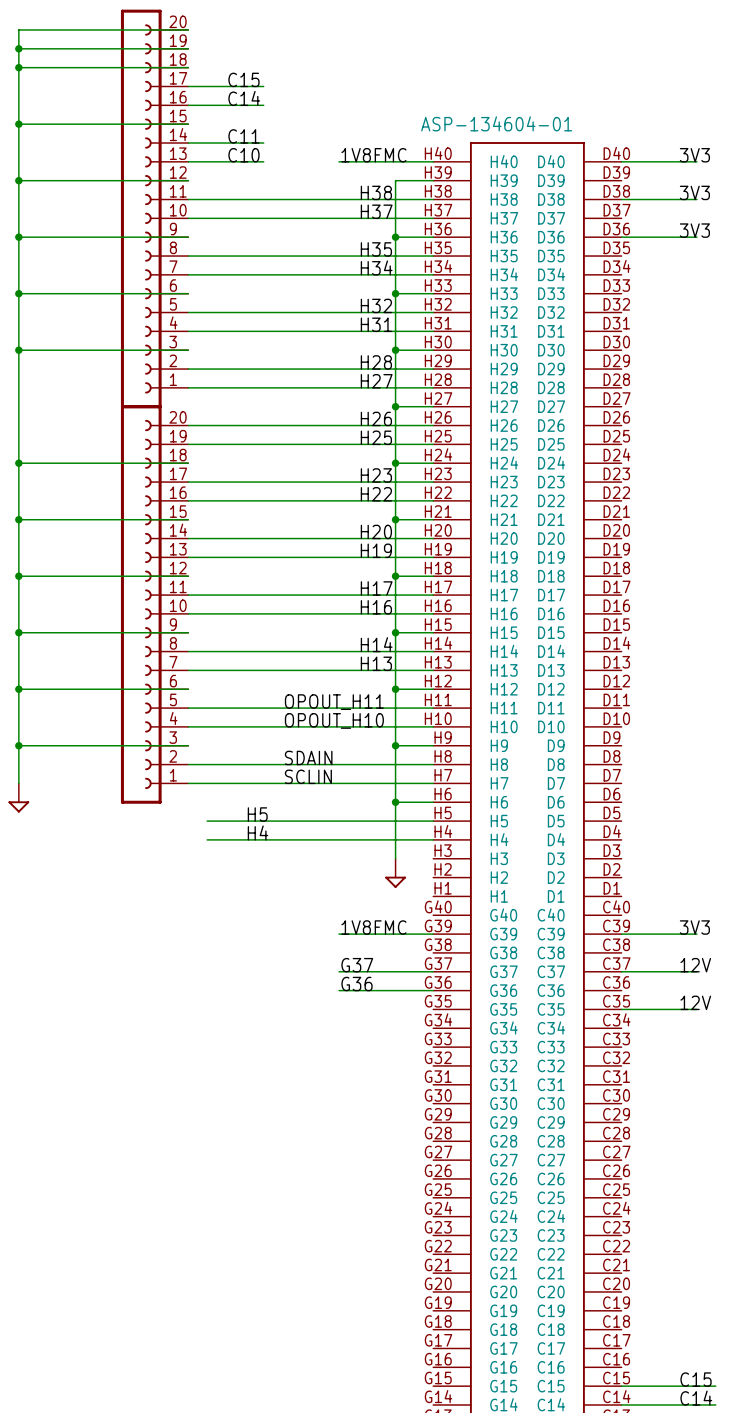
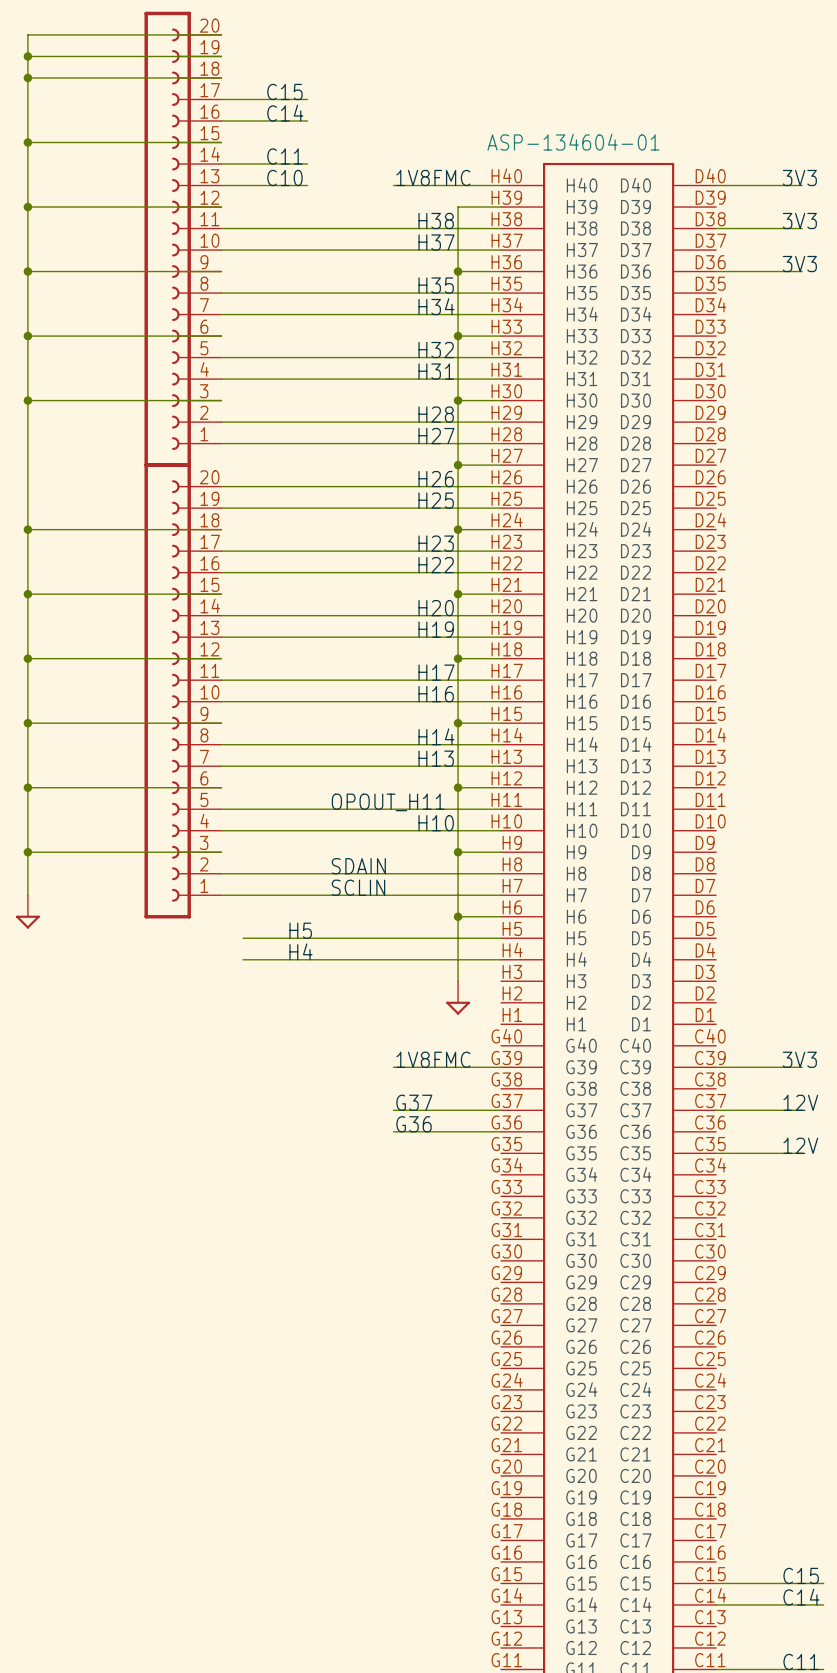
label: OPOUT_H10 (334, 720) -> none
label: none -> H10 (436, 823)

